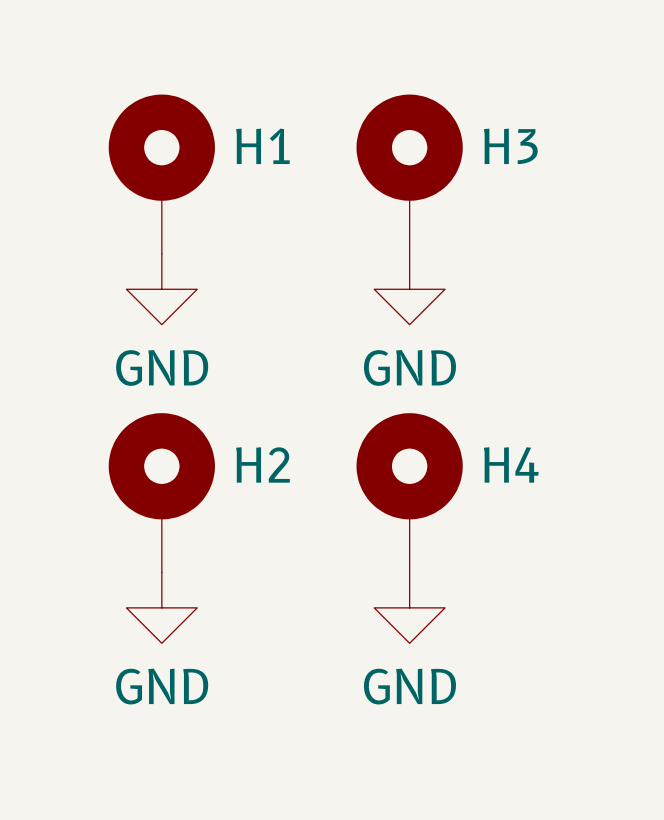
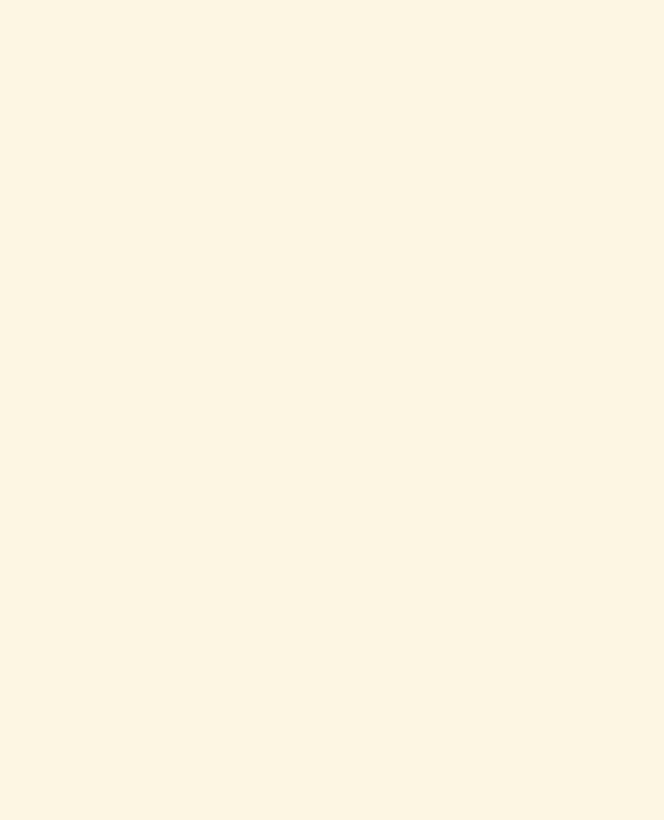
H1: (161, 174) -> none
H3: (409, 174) -> none
power symbol: GND (161, 289) -> none
power symbol: GND (409, 289) -> none
H2: (161, 492) -> none
H4: (409, 492) -> none
power symbol: GND (161, 607) -> none
power symbol: GND (409, 607) -> none

